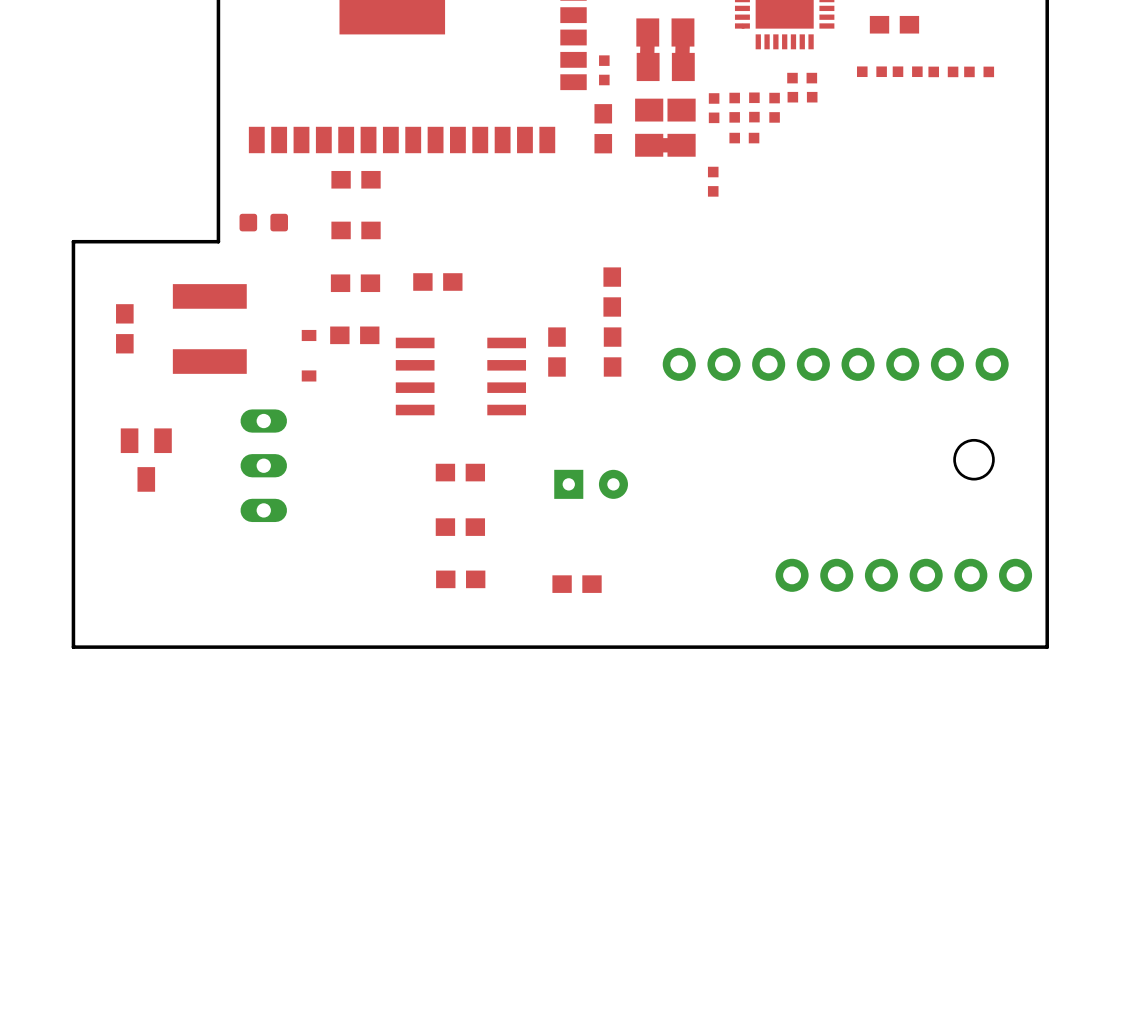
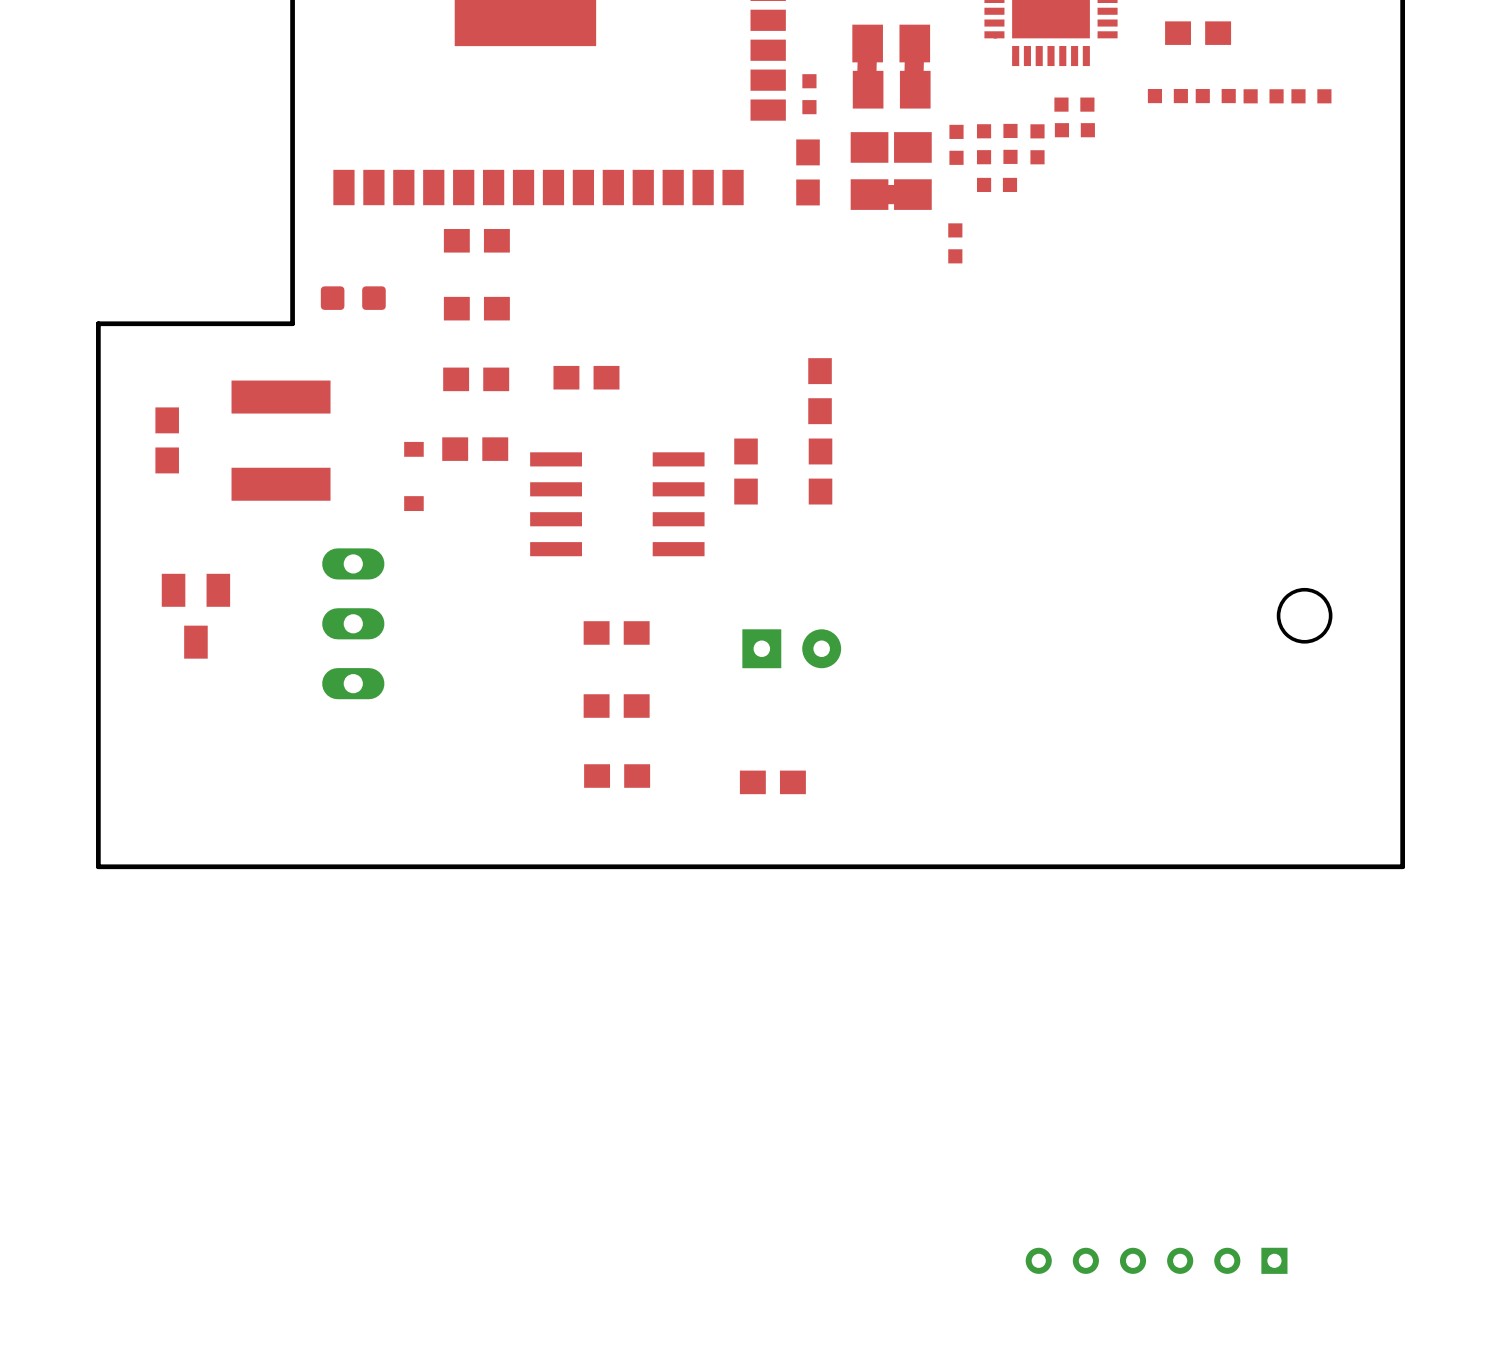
part: (835, 364) -> none
part: (903, 575) -> none
part: none -> (1156, 1260)

